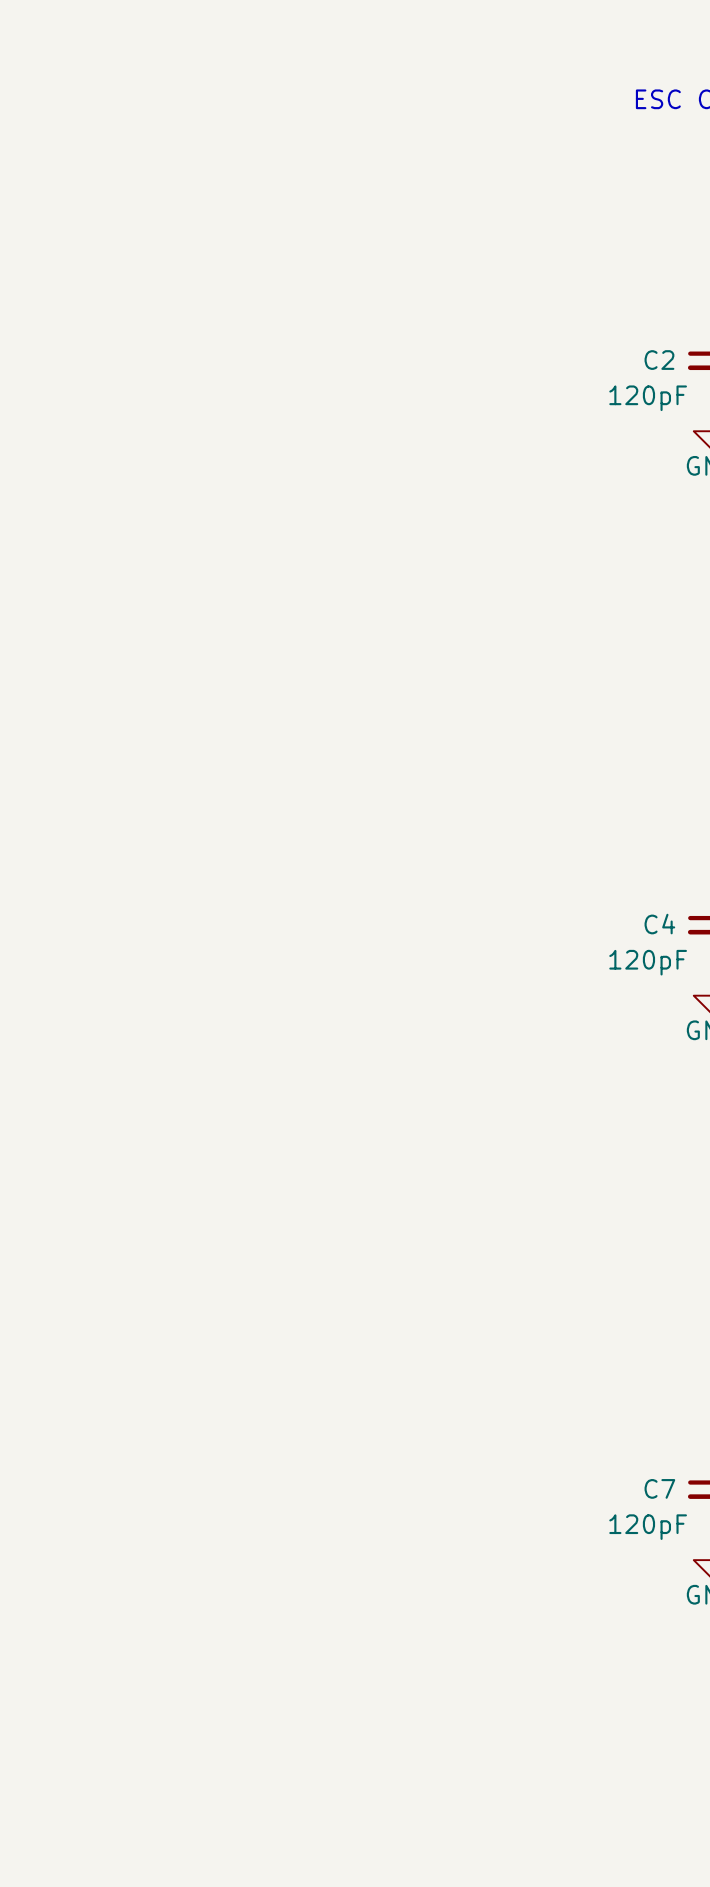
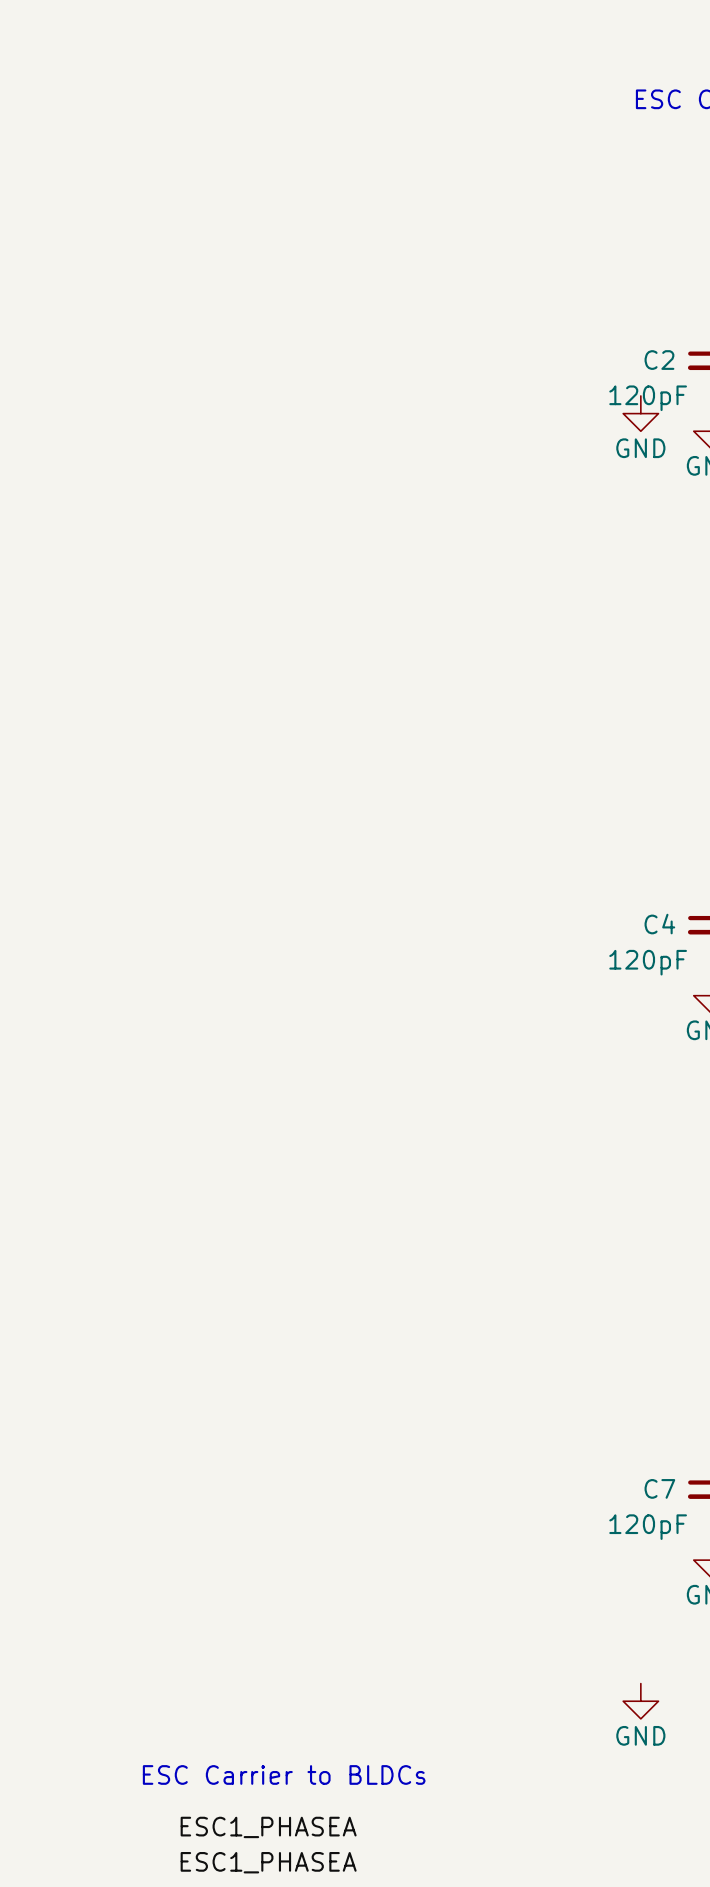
power symbol: none -> GND (640, 413)
power symbol: none -> GND (640, 1701)
text: none -> ESC Carrier to BLDCs (284, 1774)
label: none -> ESC1_PHASEA (268, 1827)
label: none -> ESC1_PHASEA (268, 1862)

